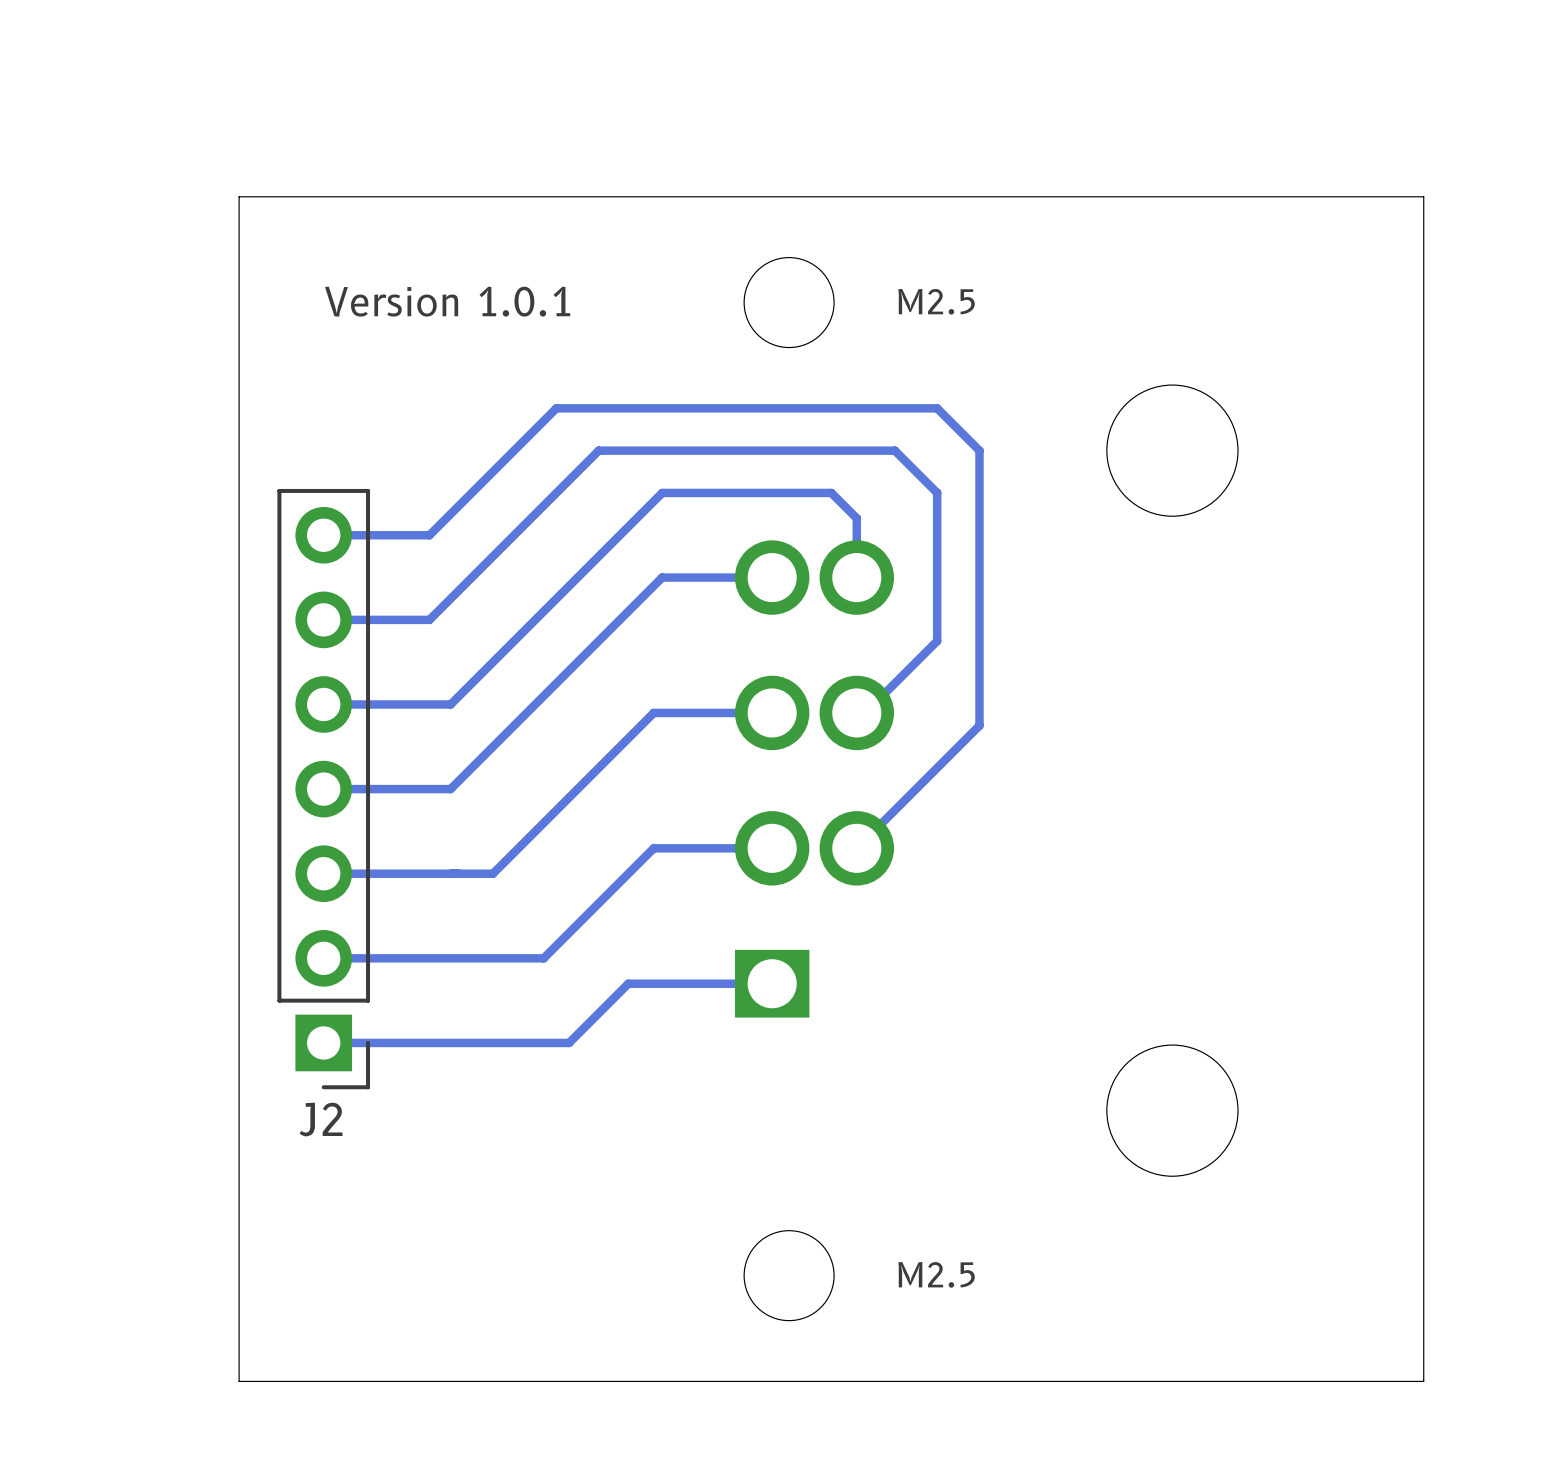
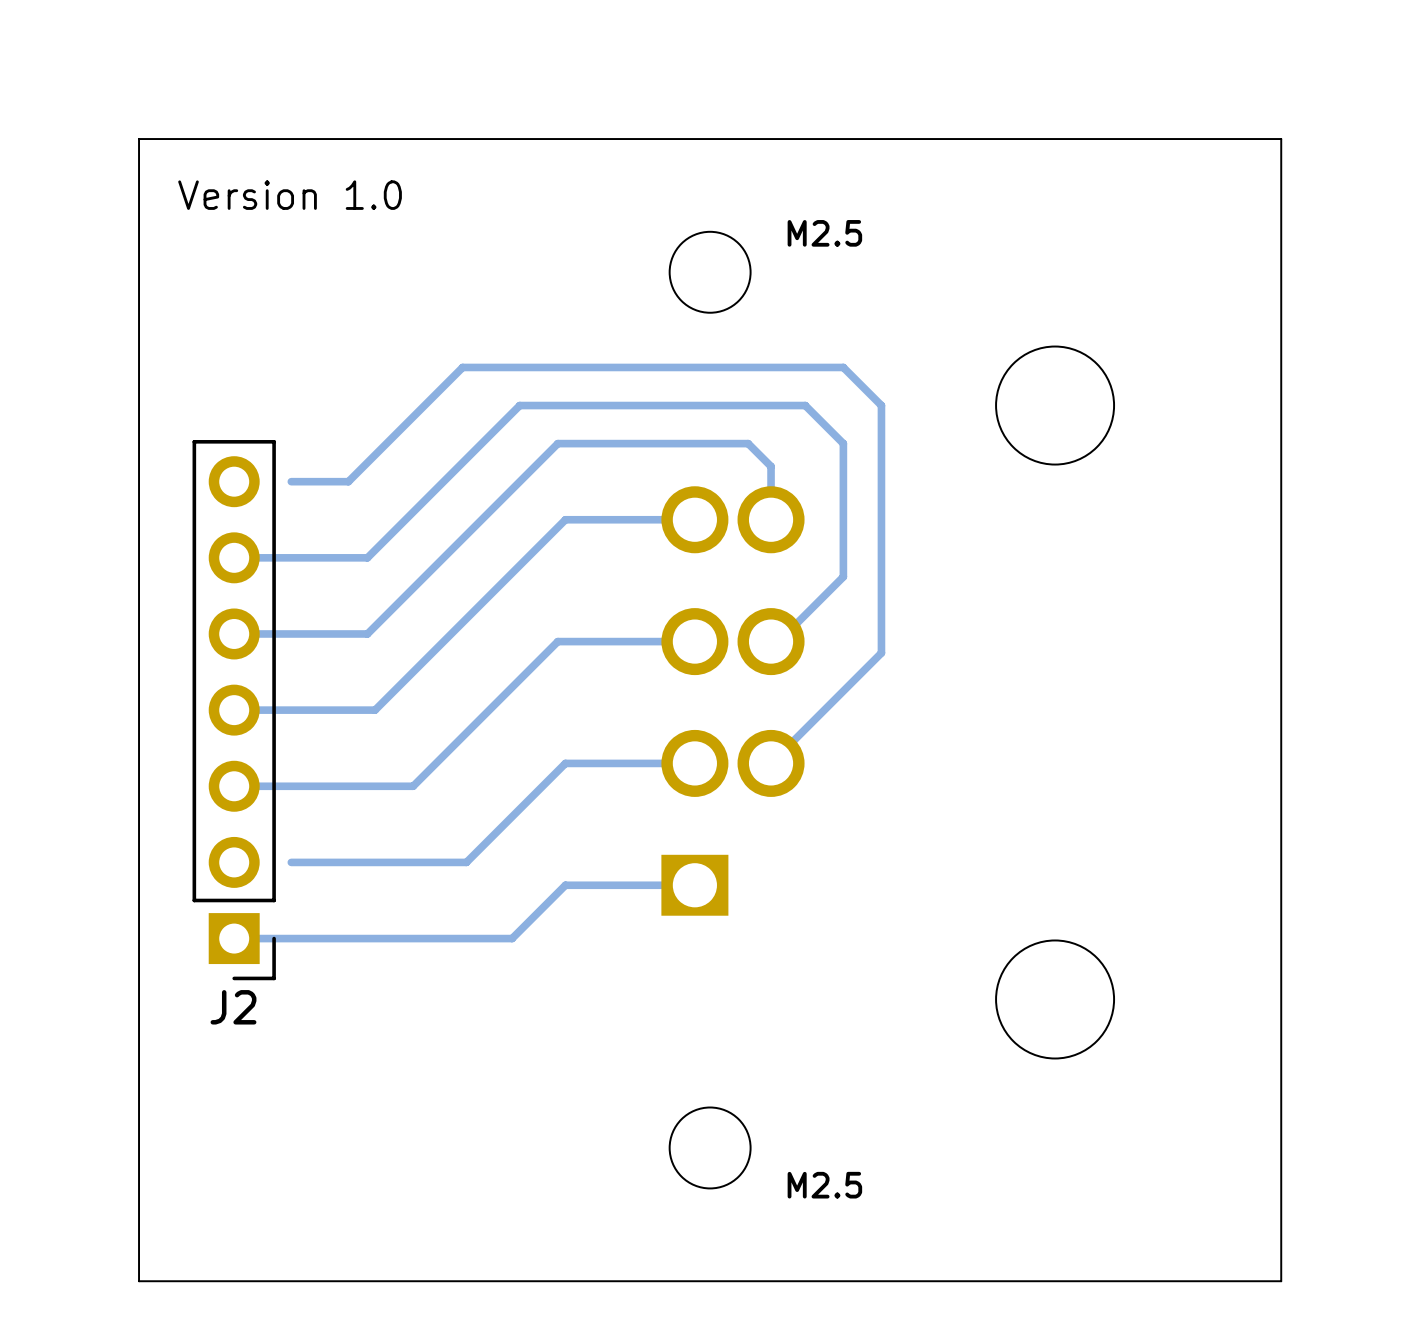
board edge: (1423, 196) (239, 196) (239, 1381) (1423, 1381) -> (1281, 177) (1281, 139) (139, 139) (139, 1281) (1281, 1281) (1281, 1243)
text: none -> Version 1.0 (290, 195)
text: Version 1.0.1 (447, 301) -> none
text position: M2.5 (936, 301) -> M2.5 (824, 233)
track: (556, 408) (429, 535) (387, 535) -> (500, 367) (462, 367) (348, 481)
track: (598, 450) (429, 619) (408, 619) -> (538, 405) (519, 405) (367, 557)
track: (662, 492) (450, 704) (408, 704) -> (595, 443) (557, 443) (367, 633)
track: (662, 577) (450, 789) (416, 789) -> (595, 519) (565, 519) (375, 710)
track: none -> (291, 557) (234, 557)
track: none -> (291, 633) (234, 633)
track: (653, 712) (492, 873) (459, 873) -> (588, 641) (557, 641) (413, 786)
track: none -> (291, 710) (234, 710)
J2 position: (323, 789) -> (234, 710)
track: (653, 848) (543, 958) (518, 958) -> (588, 763) (565, 763) (466, 862)
track: none -> (291, 786) (234, 786)
track: none -> (291, 938) (234, 938)
text position: M2.5 (936, 1274) -> M2.5 (824, 1185)

